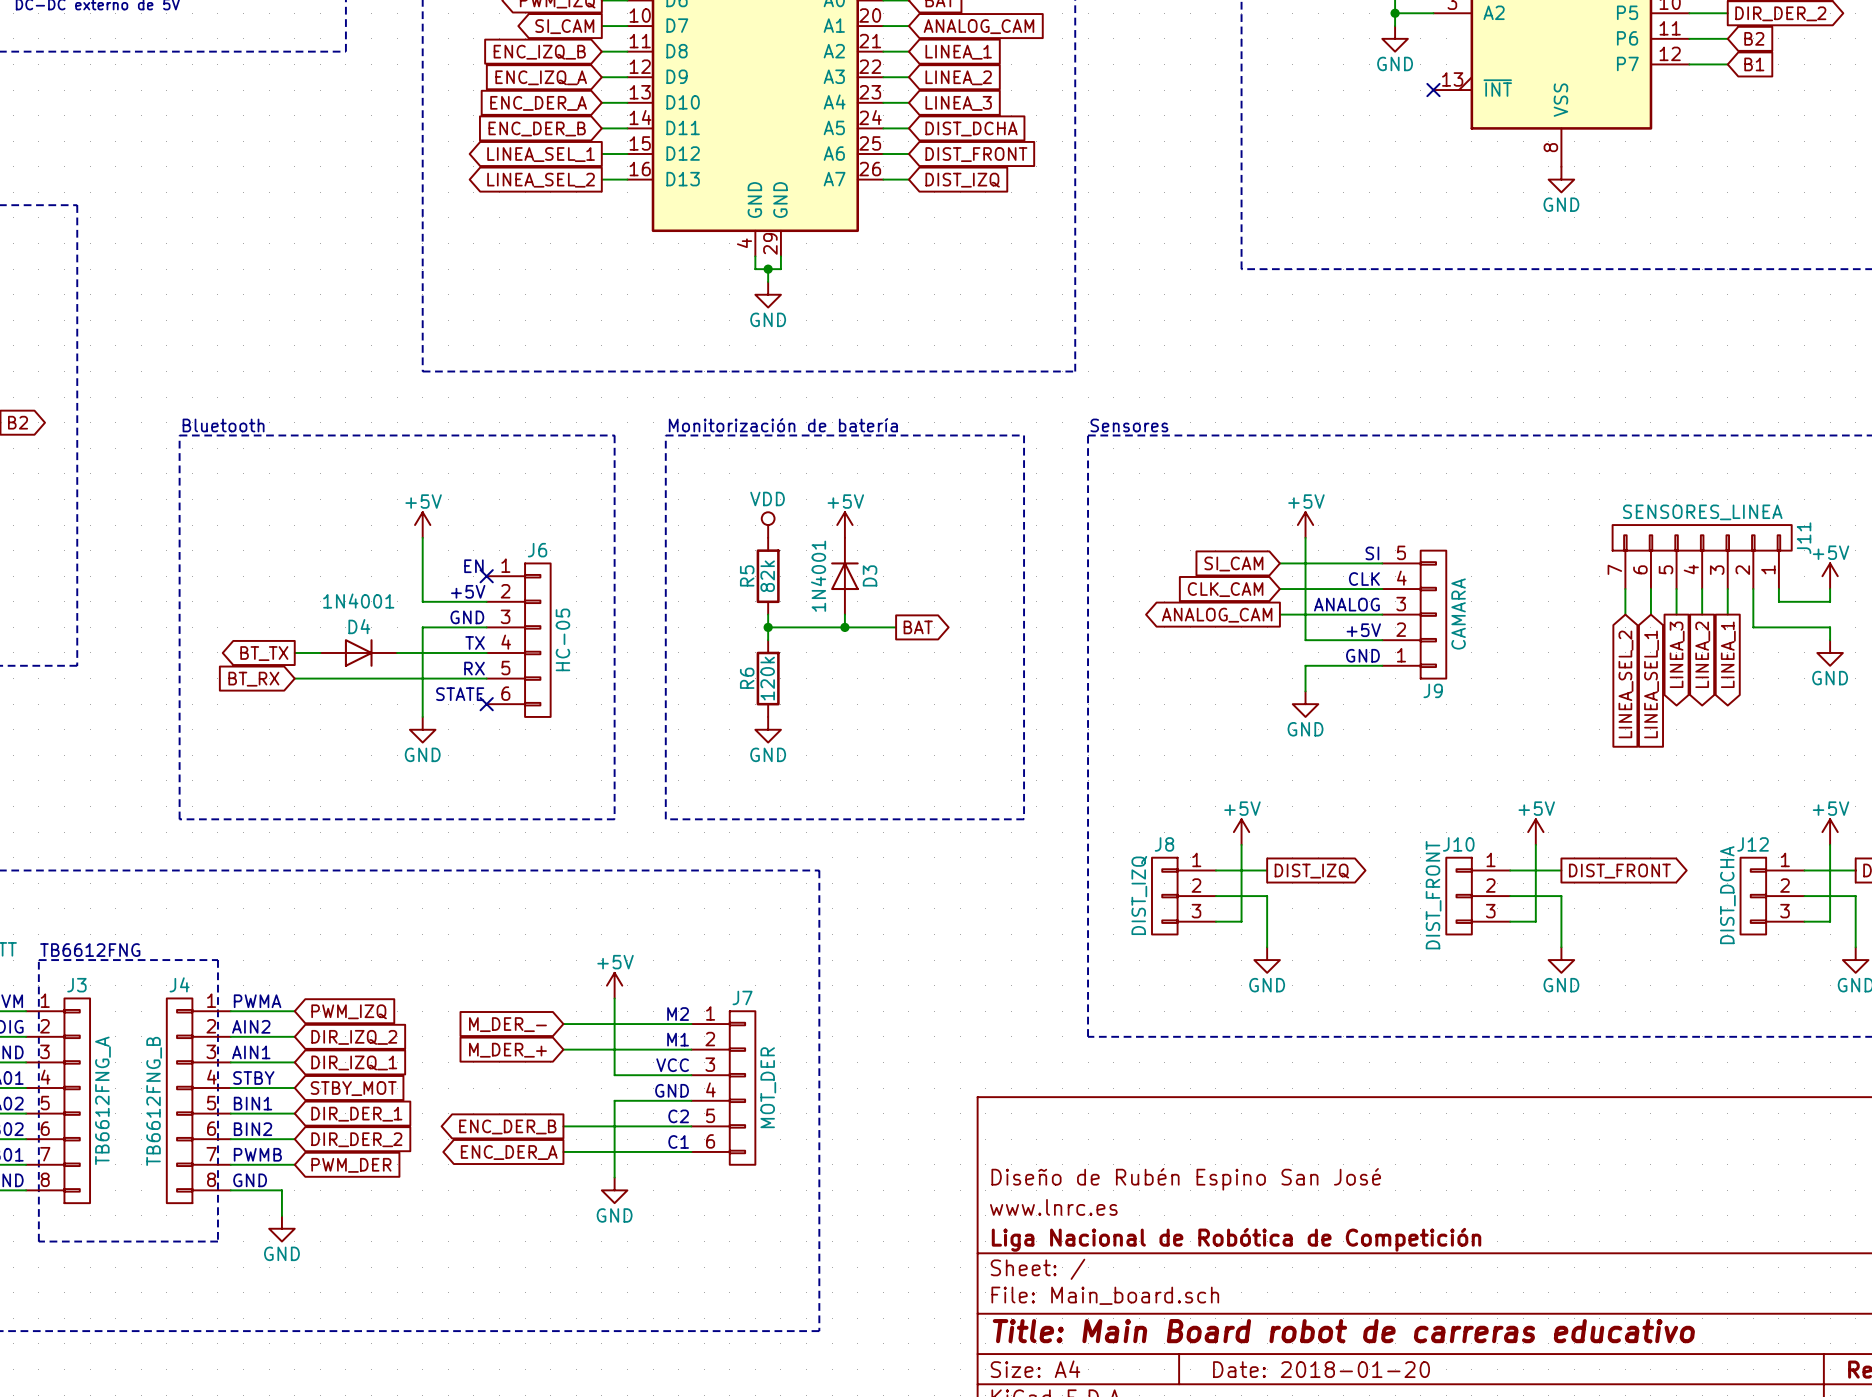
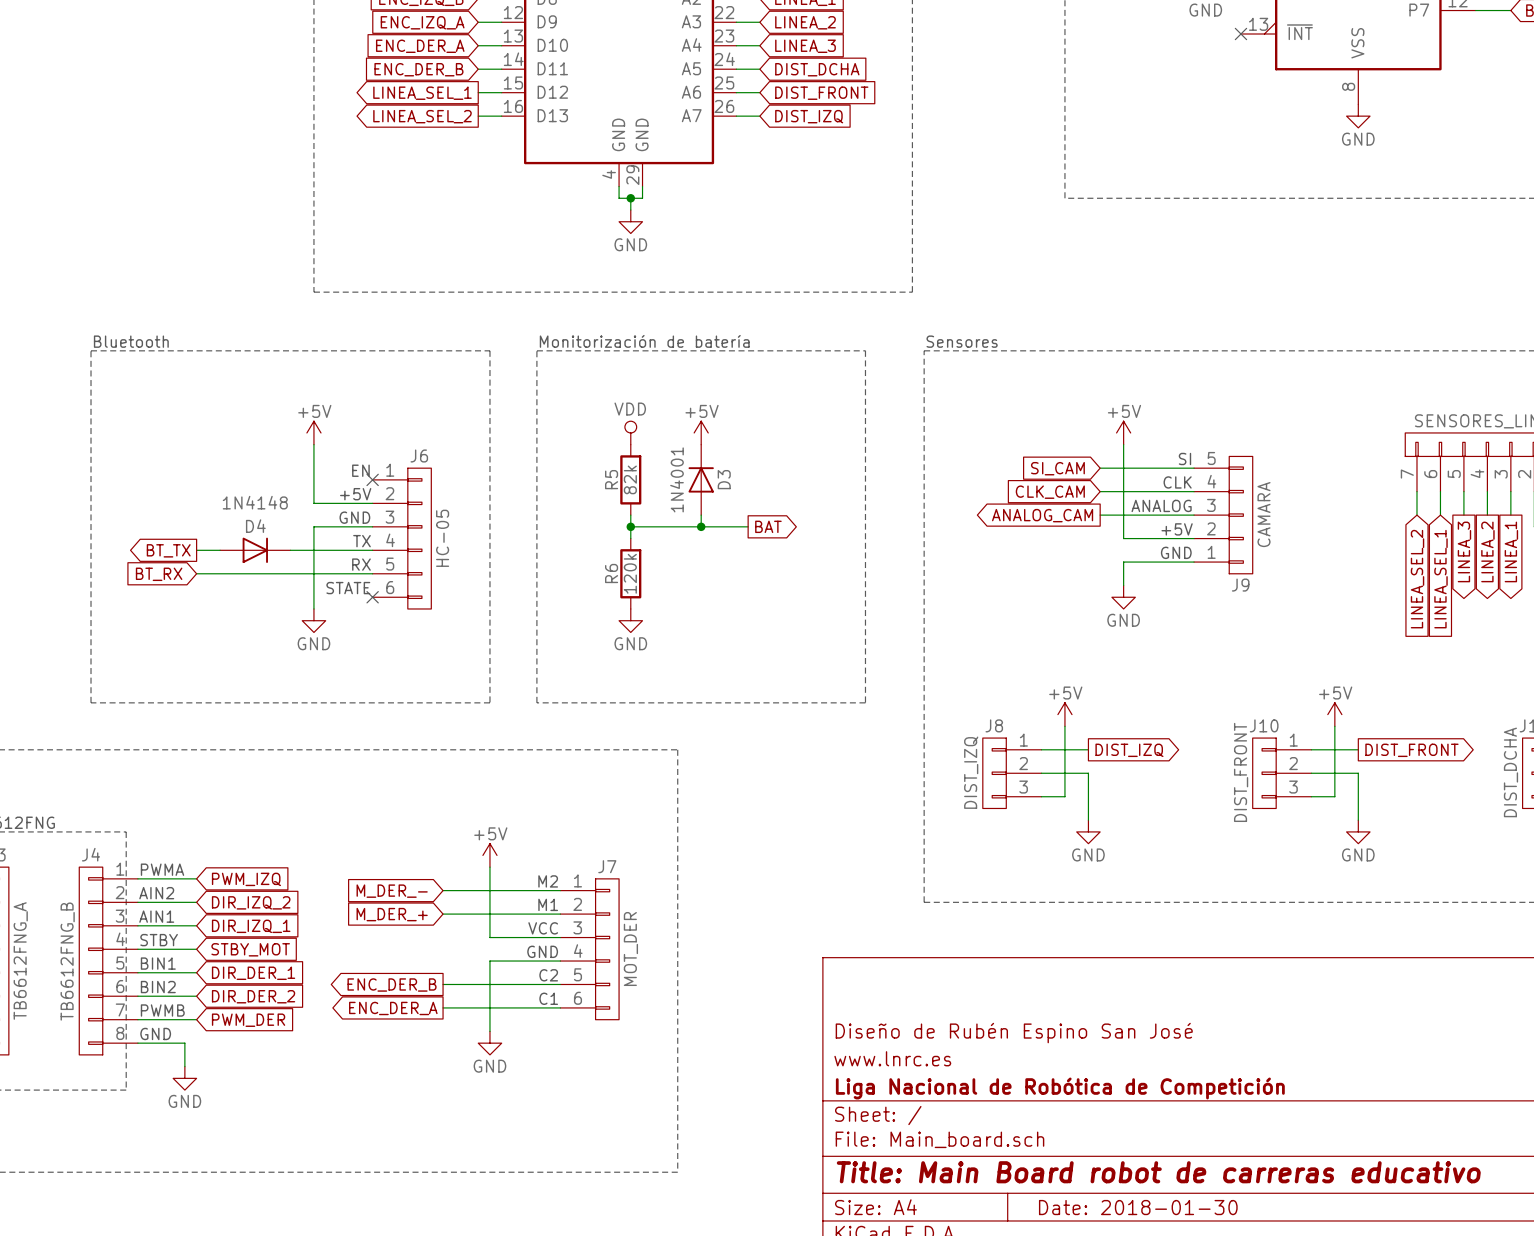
D4 value: 1N4001 (358, 601) -> 1N4148 (255, 502)
title block: Date: 2018-01-20 (1321, 1369) -> Date: 2018-01-30 (1138, 1207)

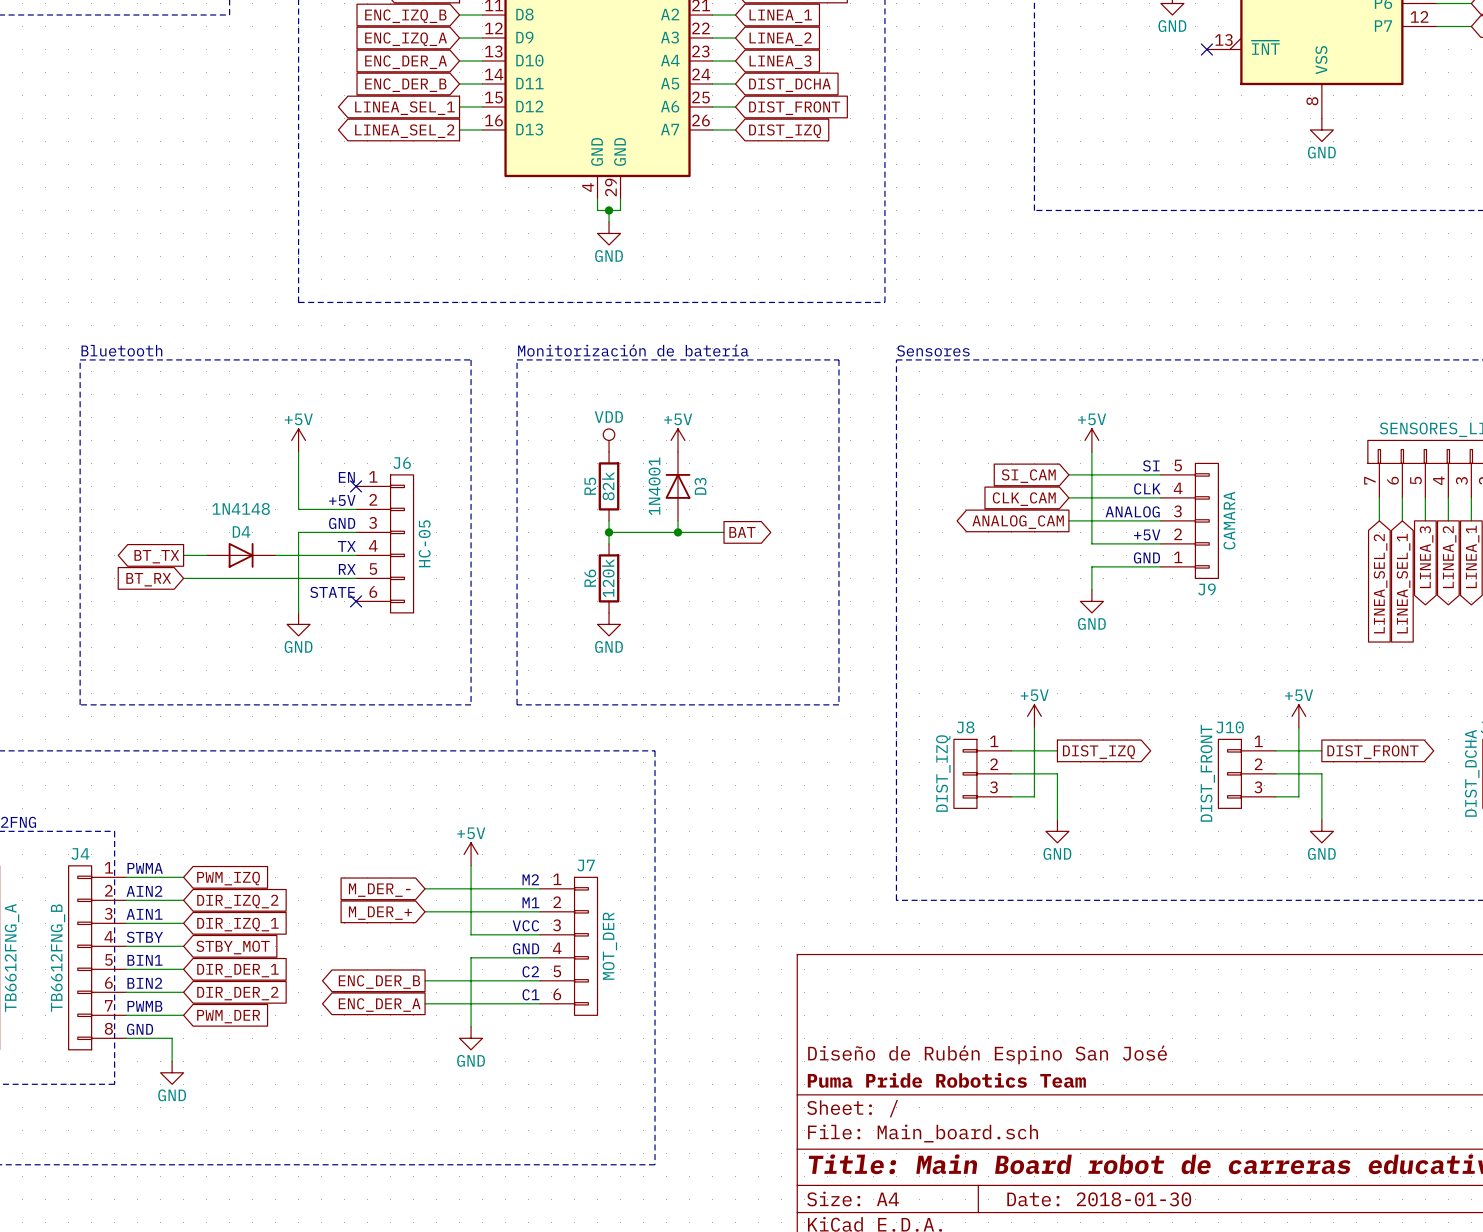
title block: Diseño de Rubén Espino San José (1014, 1033) -> none
title block: www.lnrc.es (892, 1058) -> Diseño de Rubén Espino San José (987, 1054)
title block: Liga Nacional de Robótica de Competición (1060, 1088) -> Puma Pride Robotics Team (946, 1080)

